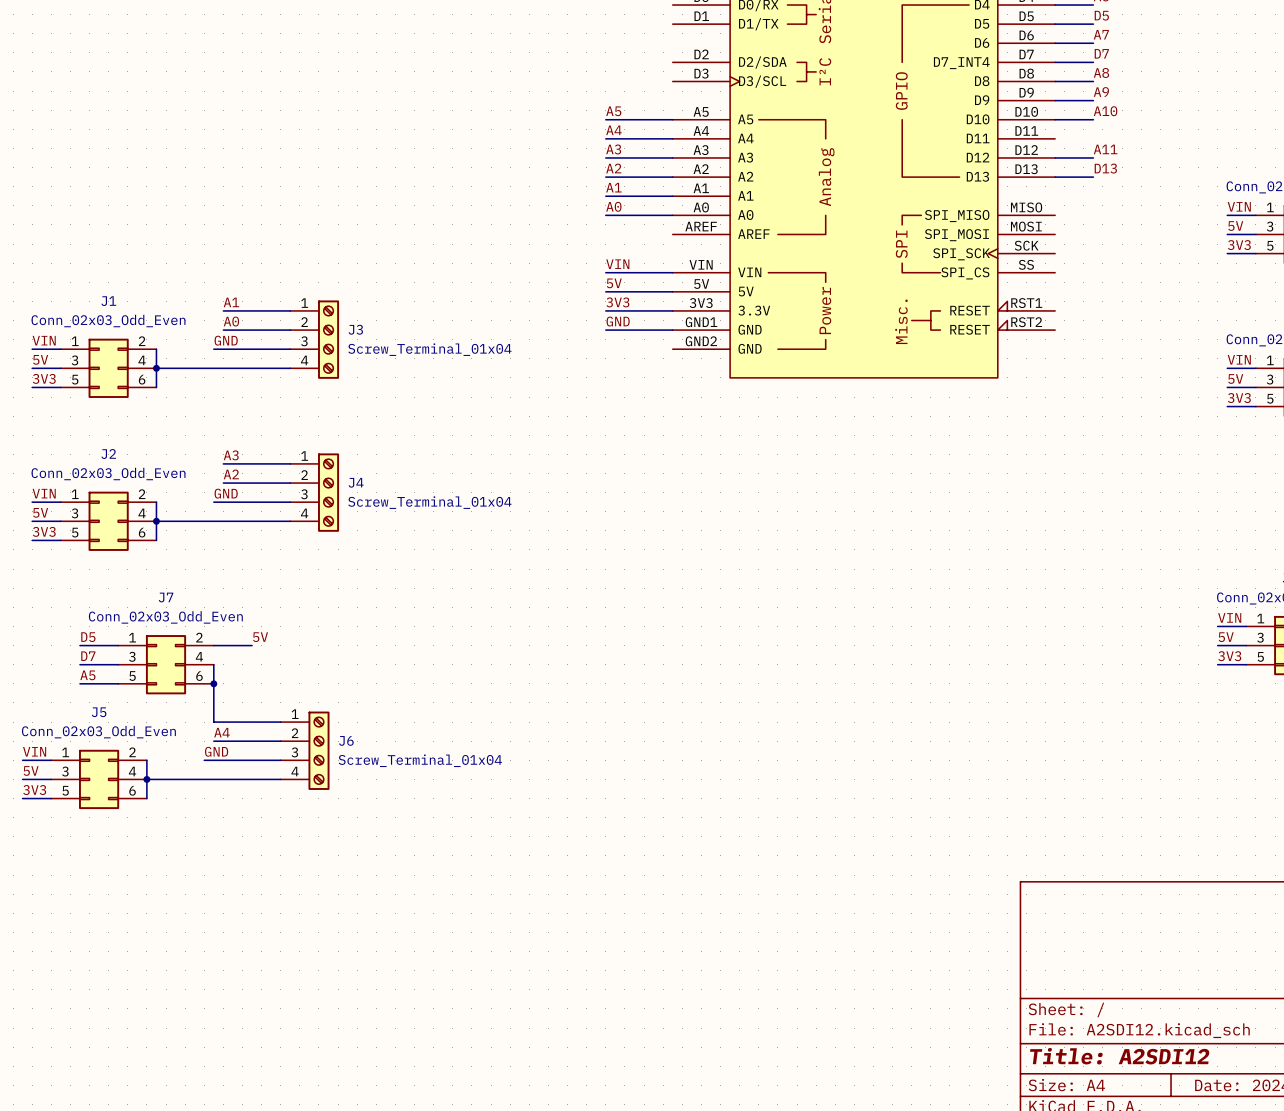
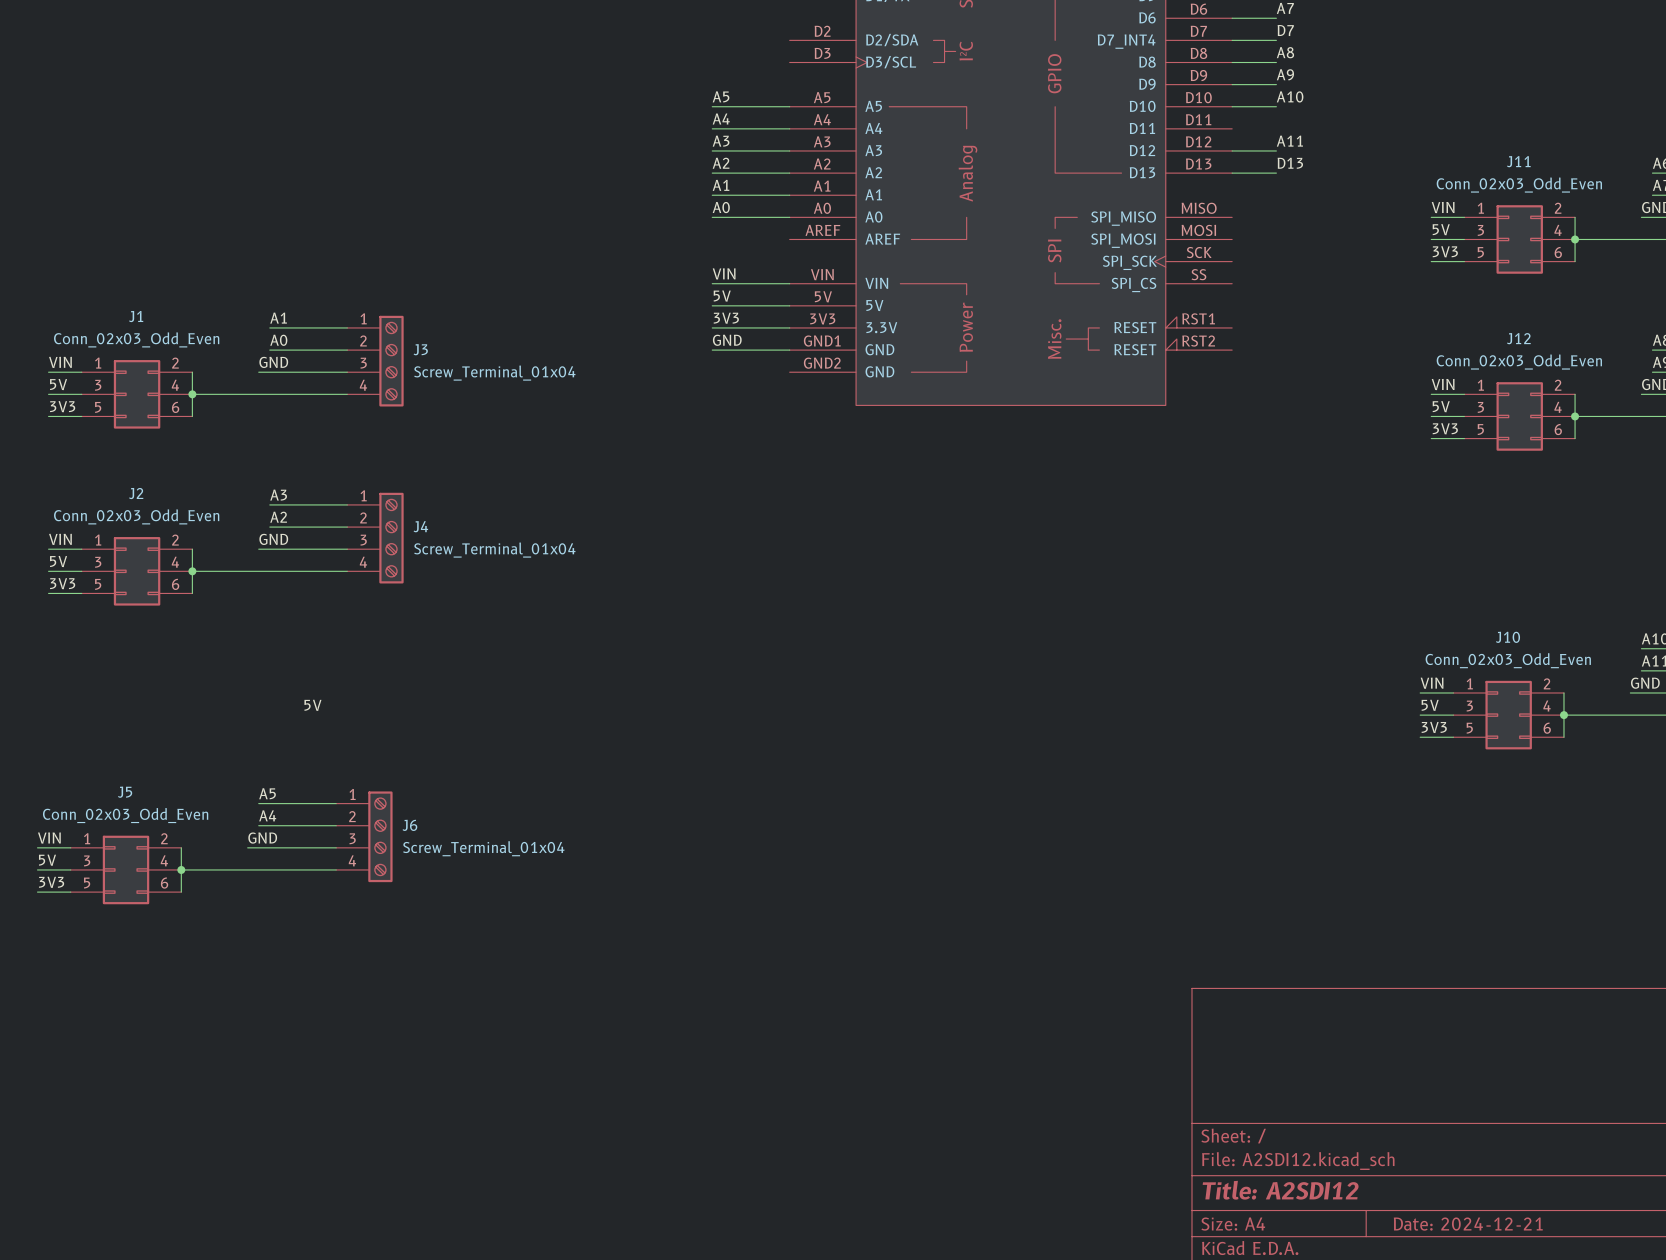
label: D5 (88, 637) -> none
wire: (79, 645) (118, 645) -> none
wire: (213, 645) (252, 645) -> none
label: D7 (88, 656) -> none
wire: (79, 664) (118, 664) -> none
J7: Conn_02x03_Odd_Even (166, 664) -> none
wire: (213, 664) (213, 722) -> none
label position: A5 (87, 675) -> A5 (267, 793)
wire: (79, 683) (118, 683) -> none
junction: (213, 683) -> none

